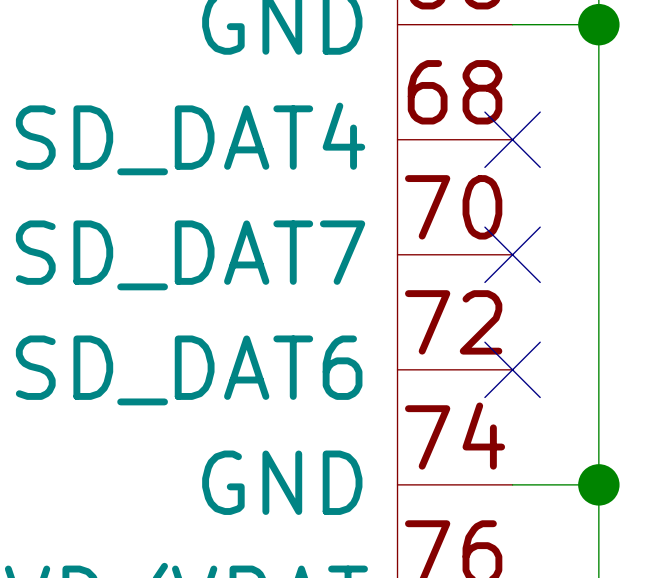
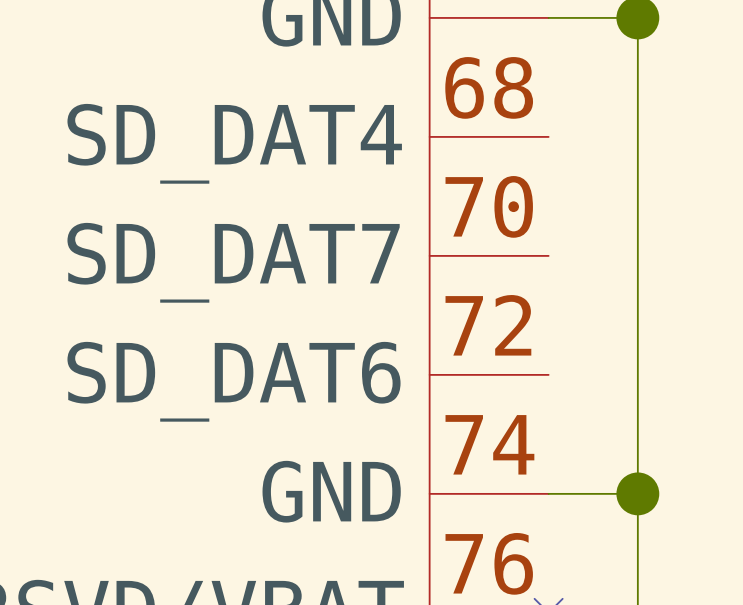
no-connect mark: (512, 139) -> none
no-connect mark: (512, 254) -> none
no-connect mark: (512, 369) -> none

